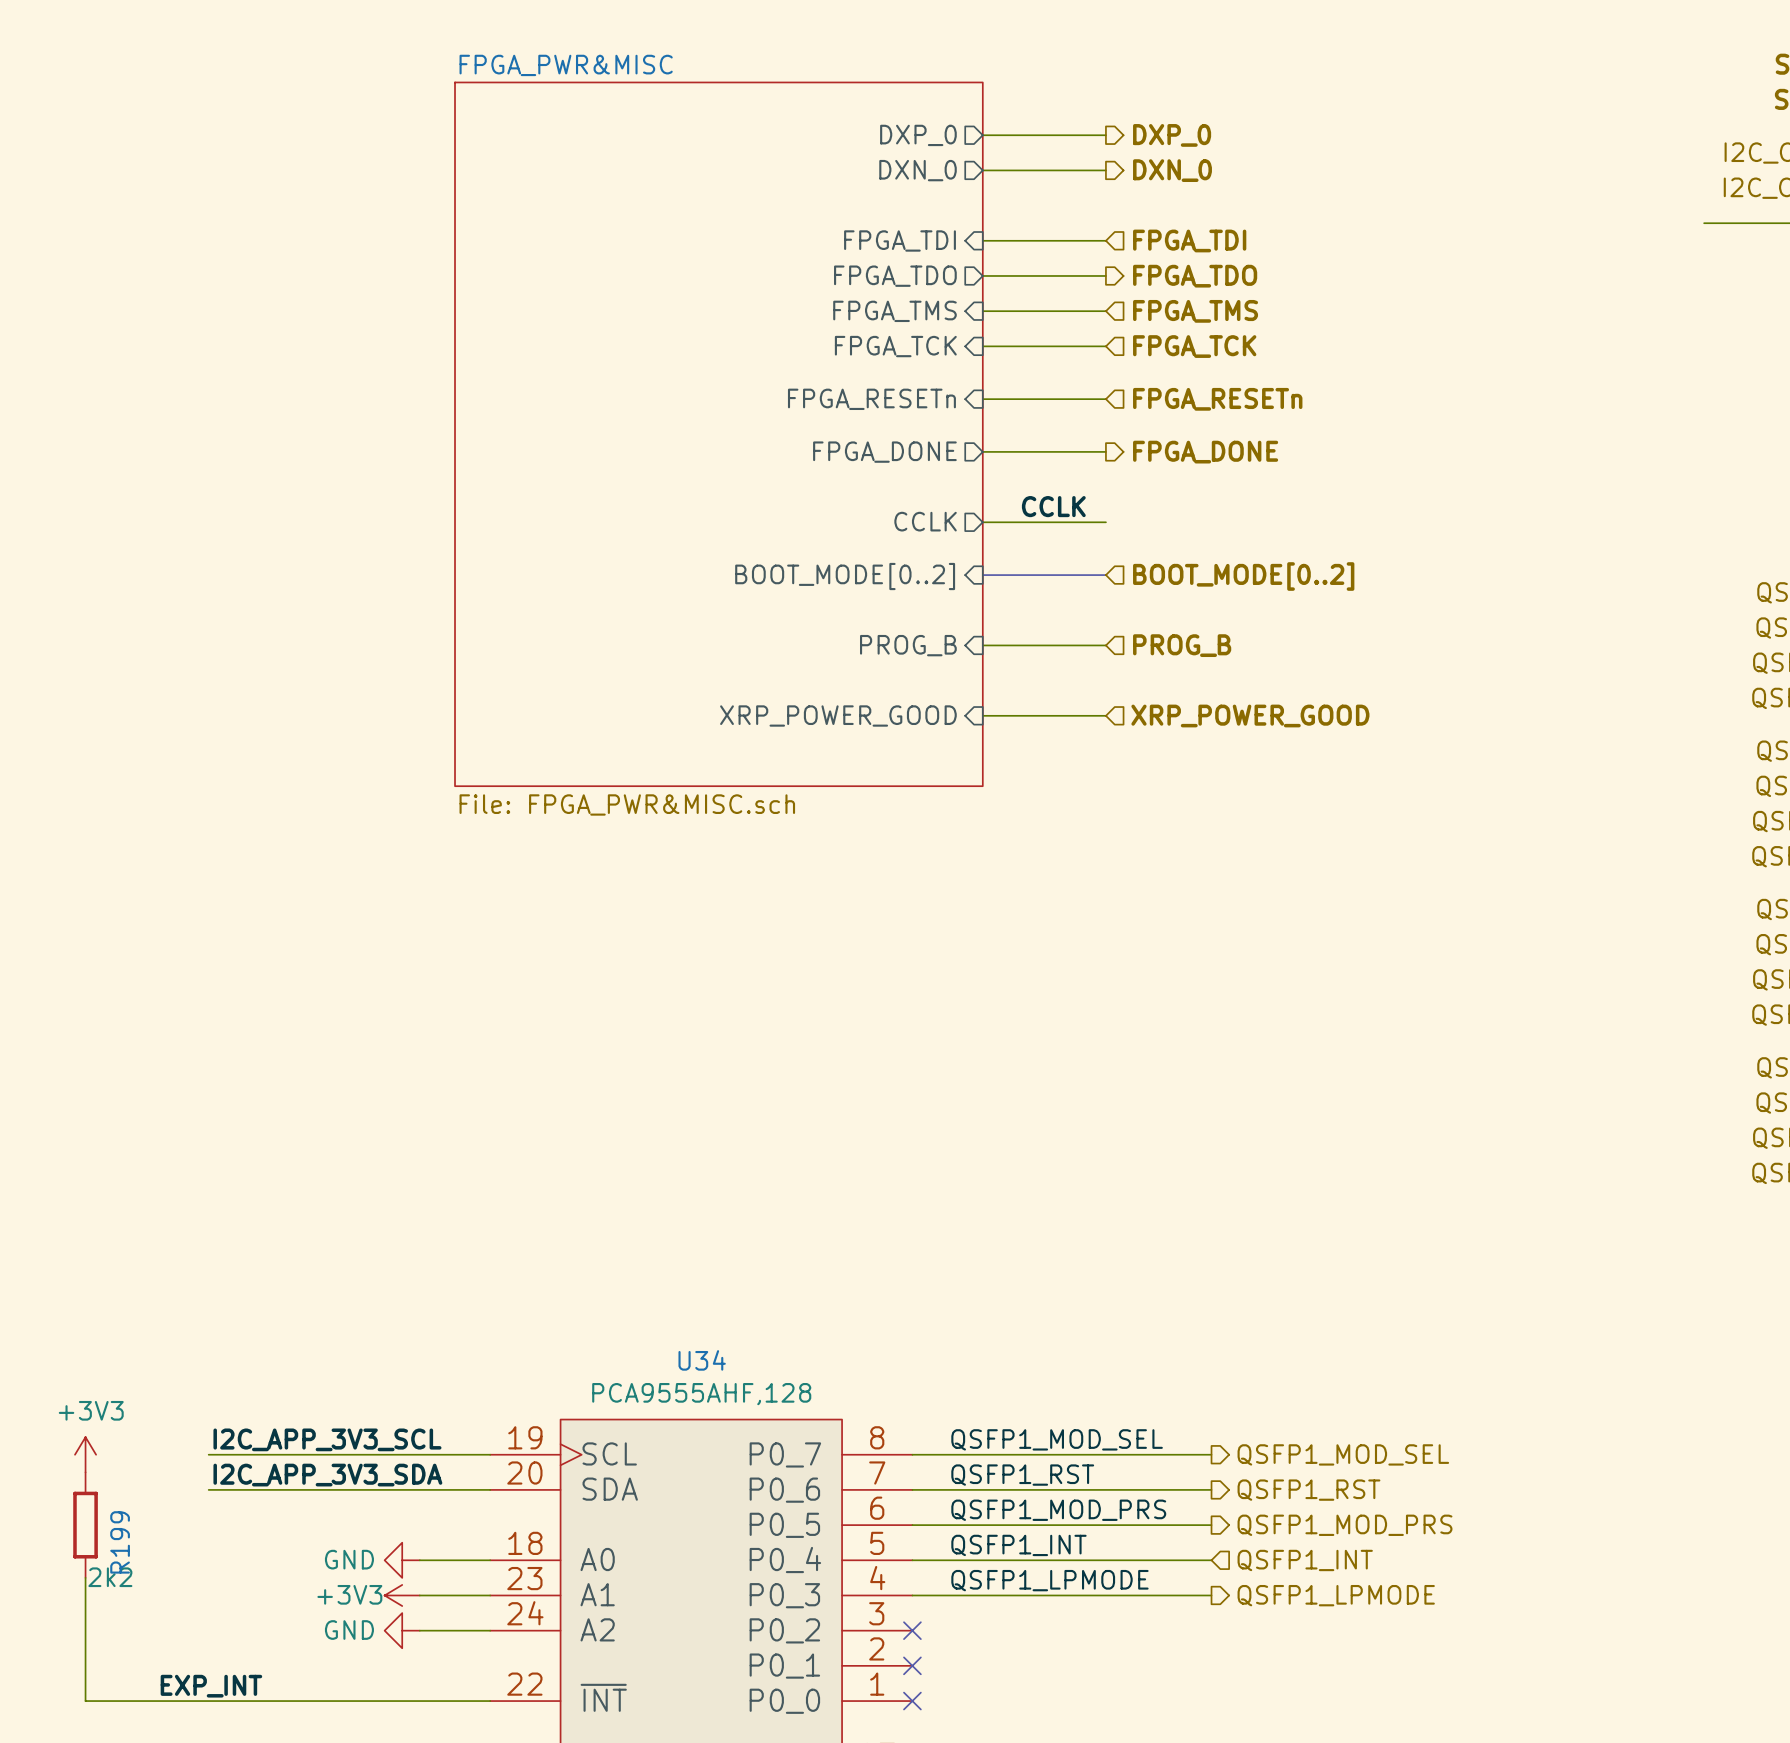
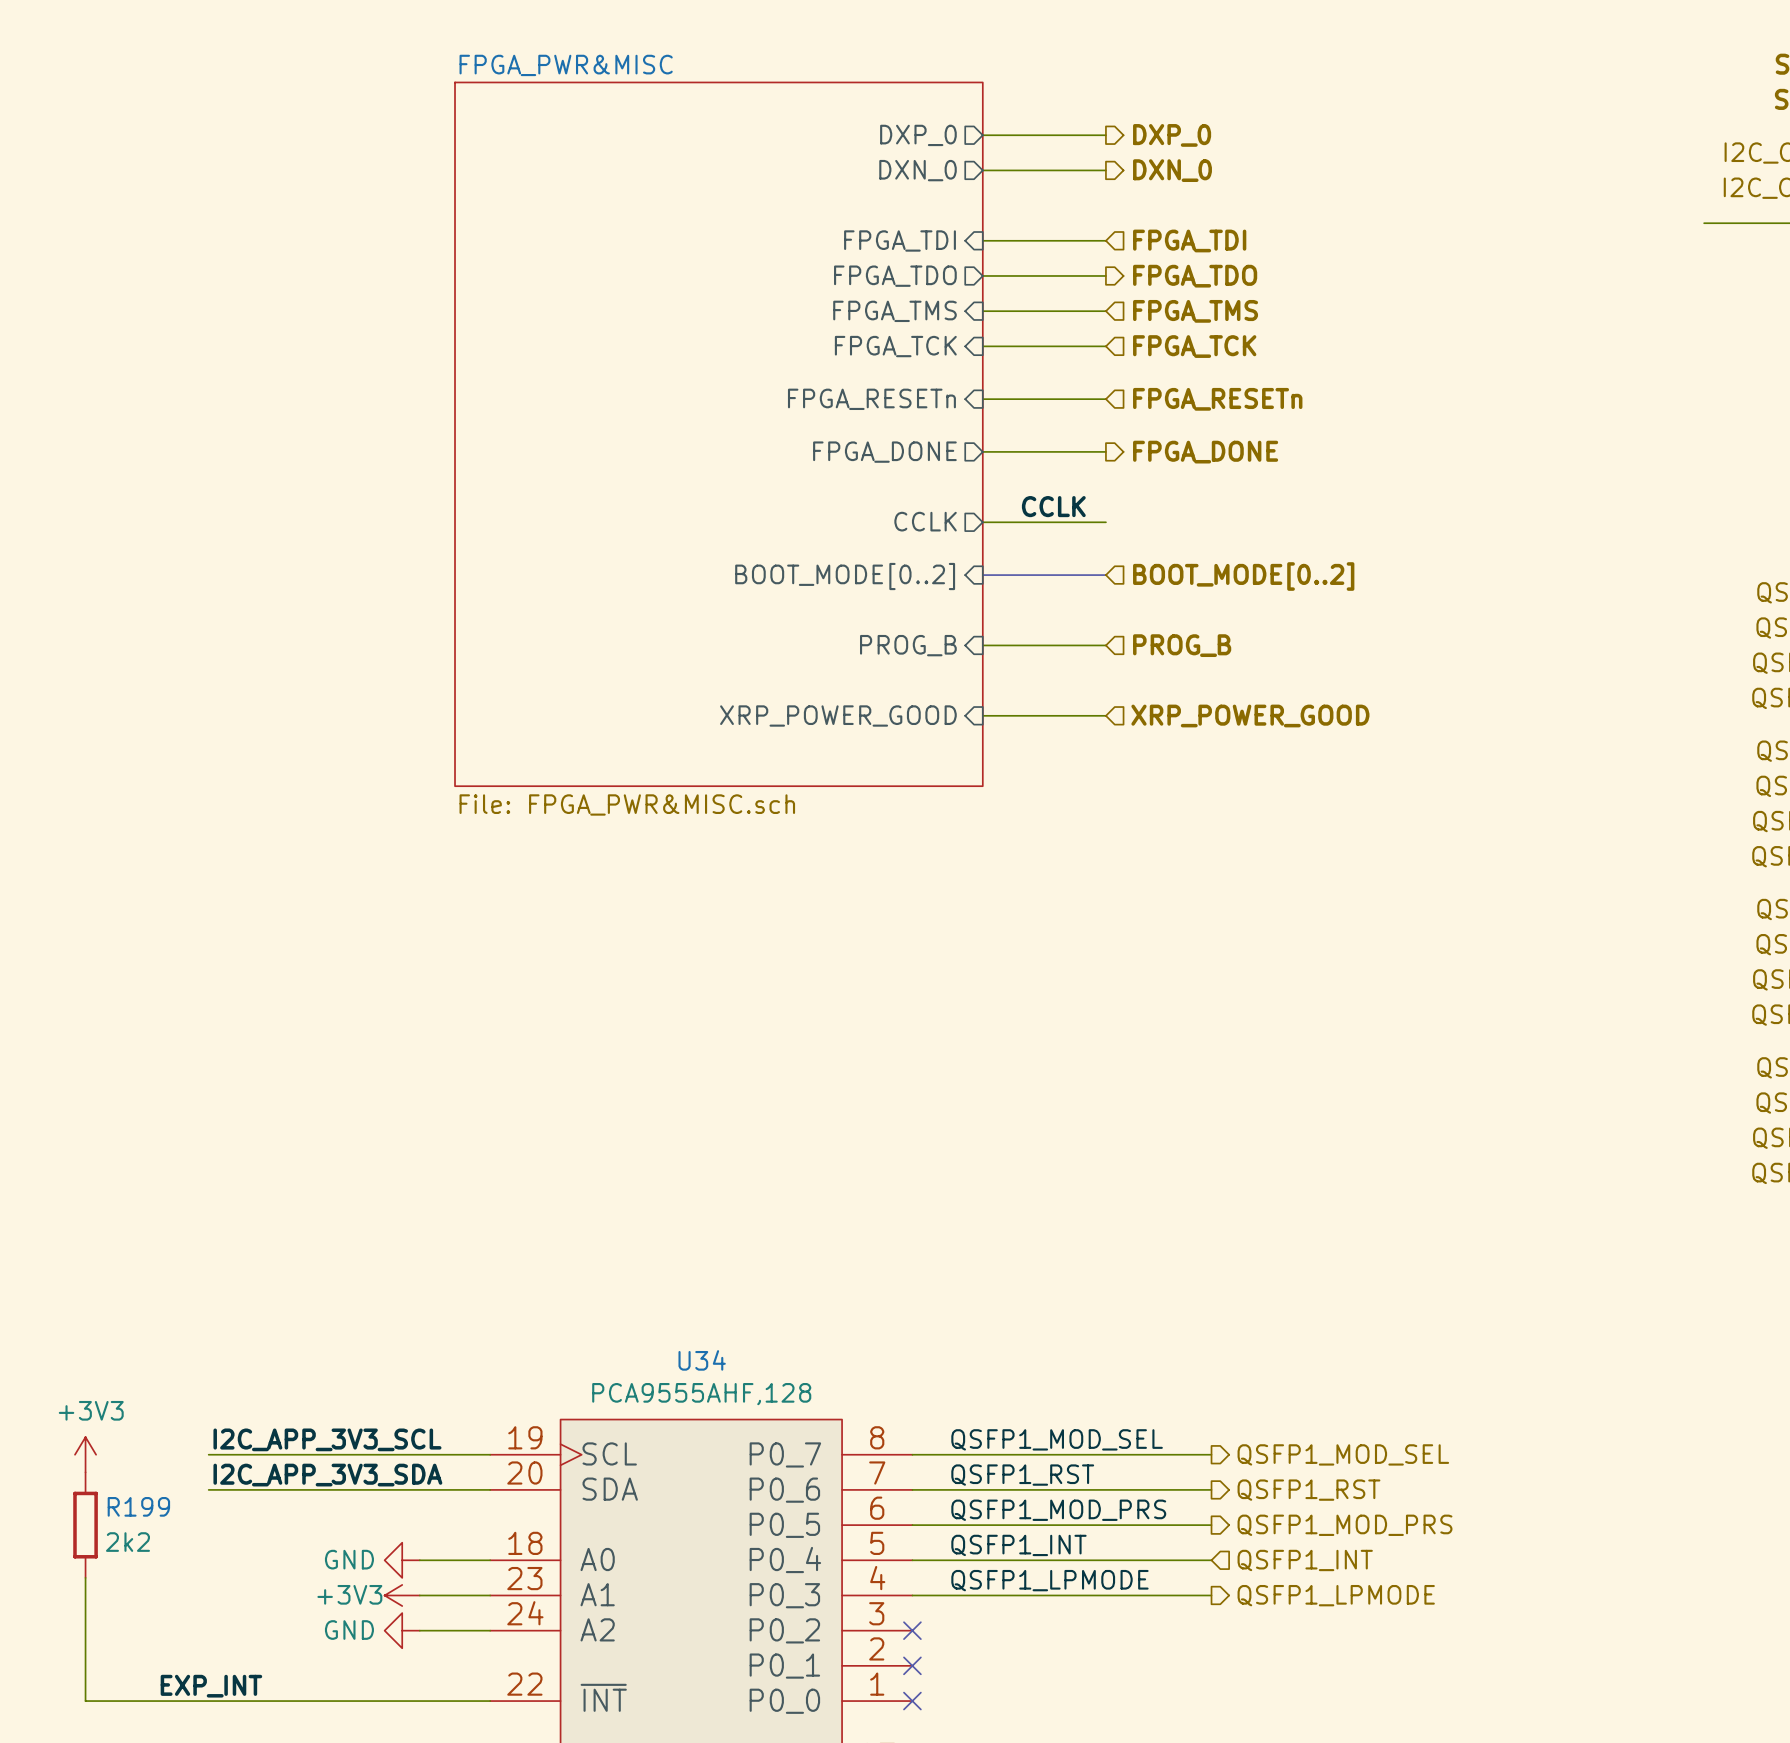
R199 name rotation: 0° (120, 1542) -> 90° clockwise (138, 1506)
R199 text position: 2k2 (110, 1577) -> 2k2 (127, 1542)

